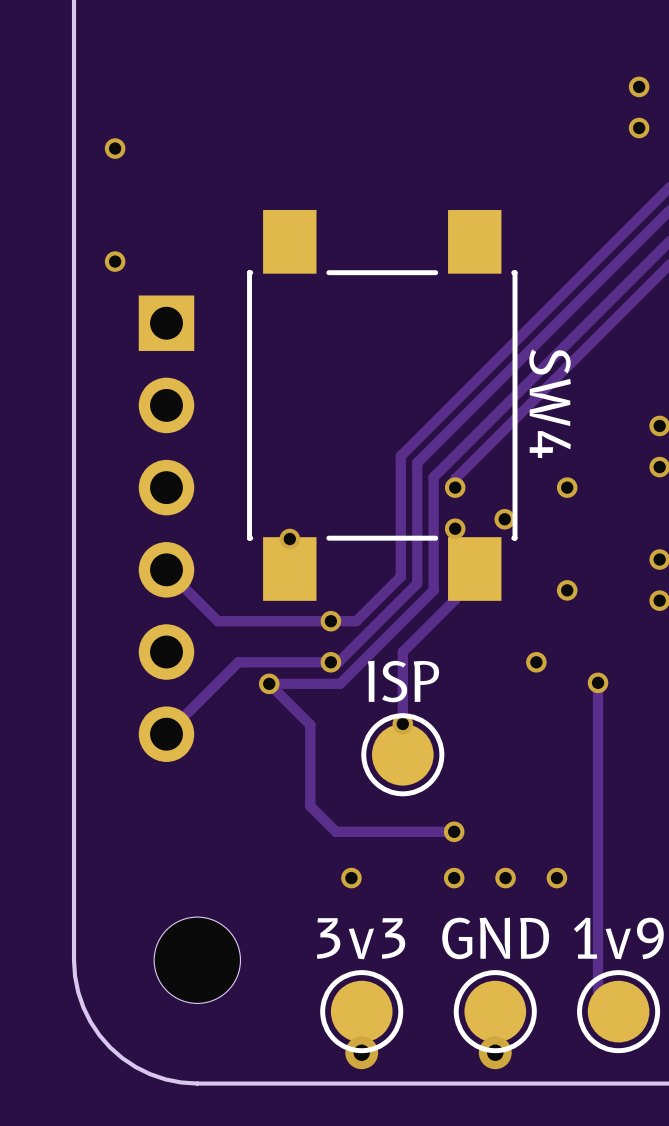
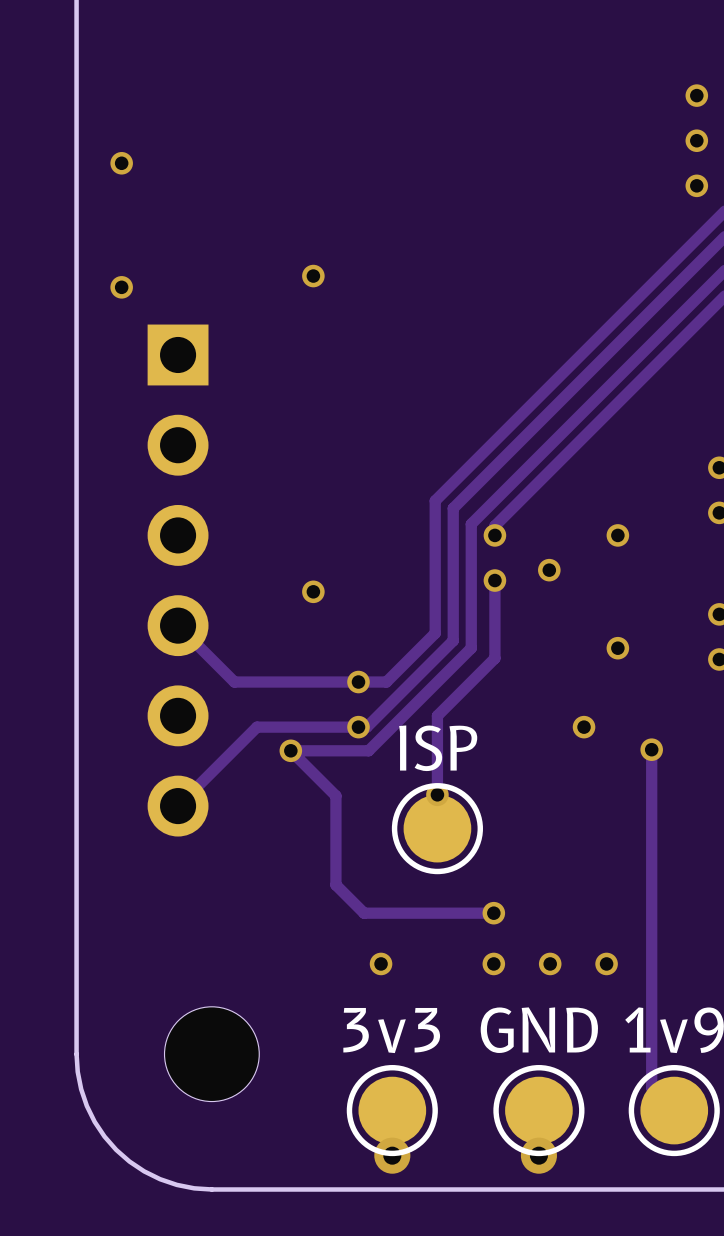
via: none -> (696, 185)
via: none -> (313, 276)
SW4: (382, 405) -> none

